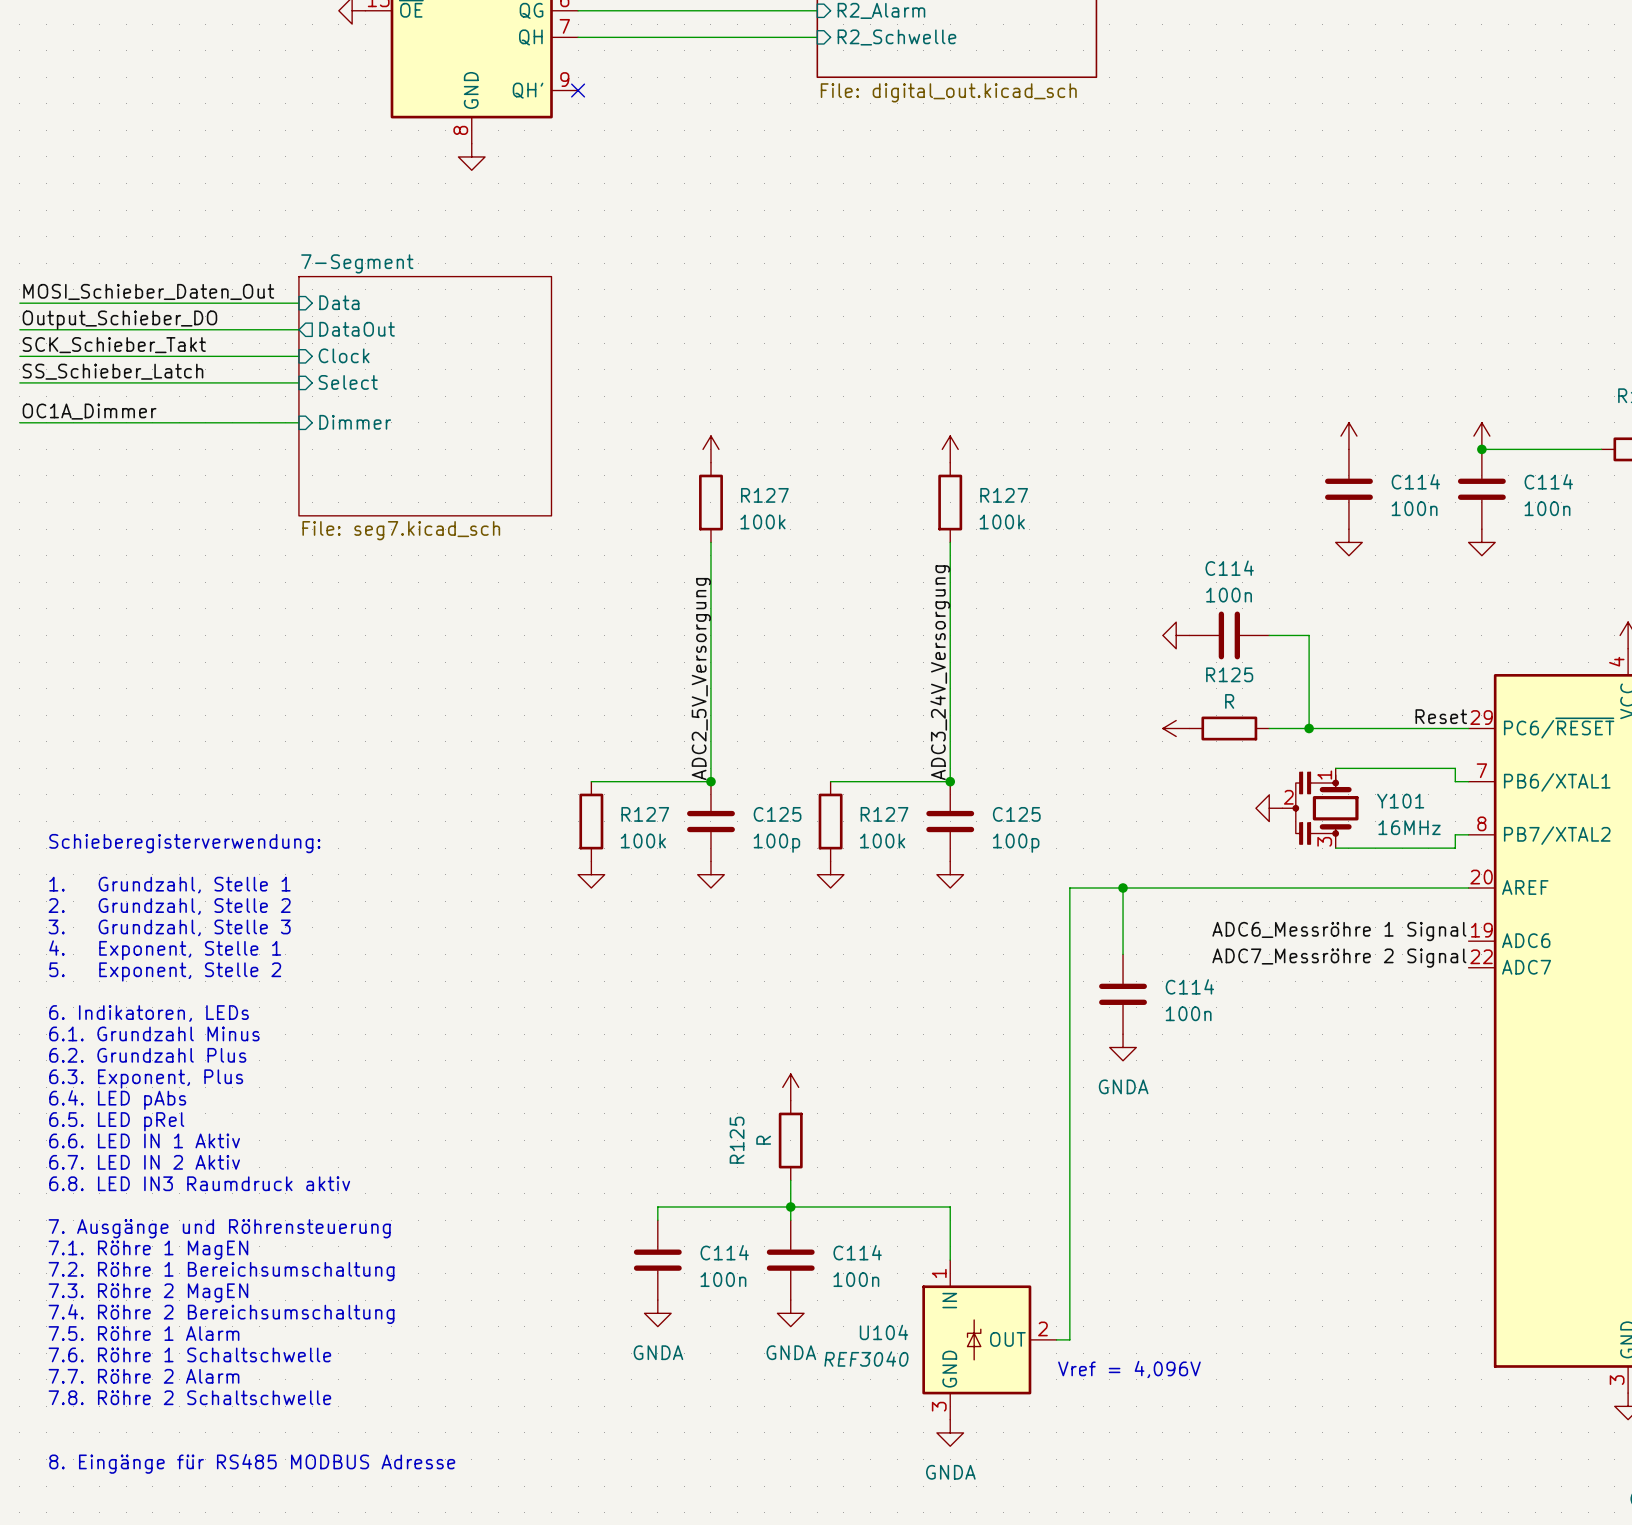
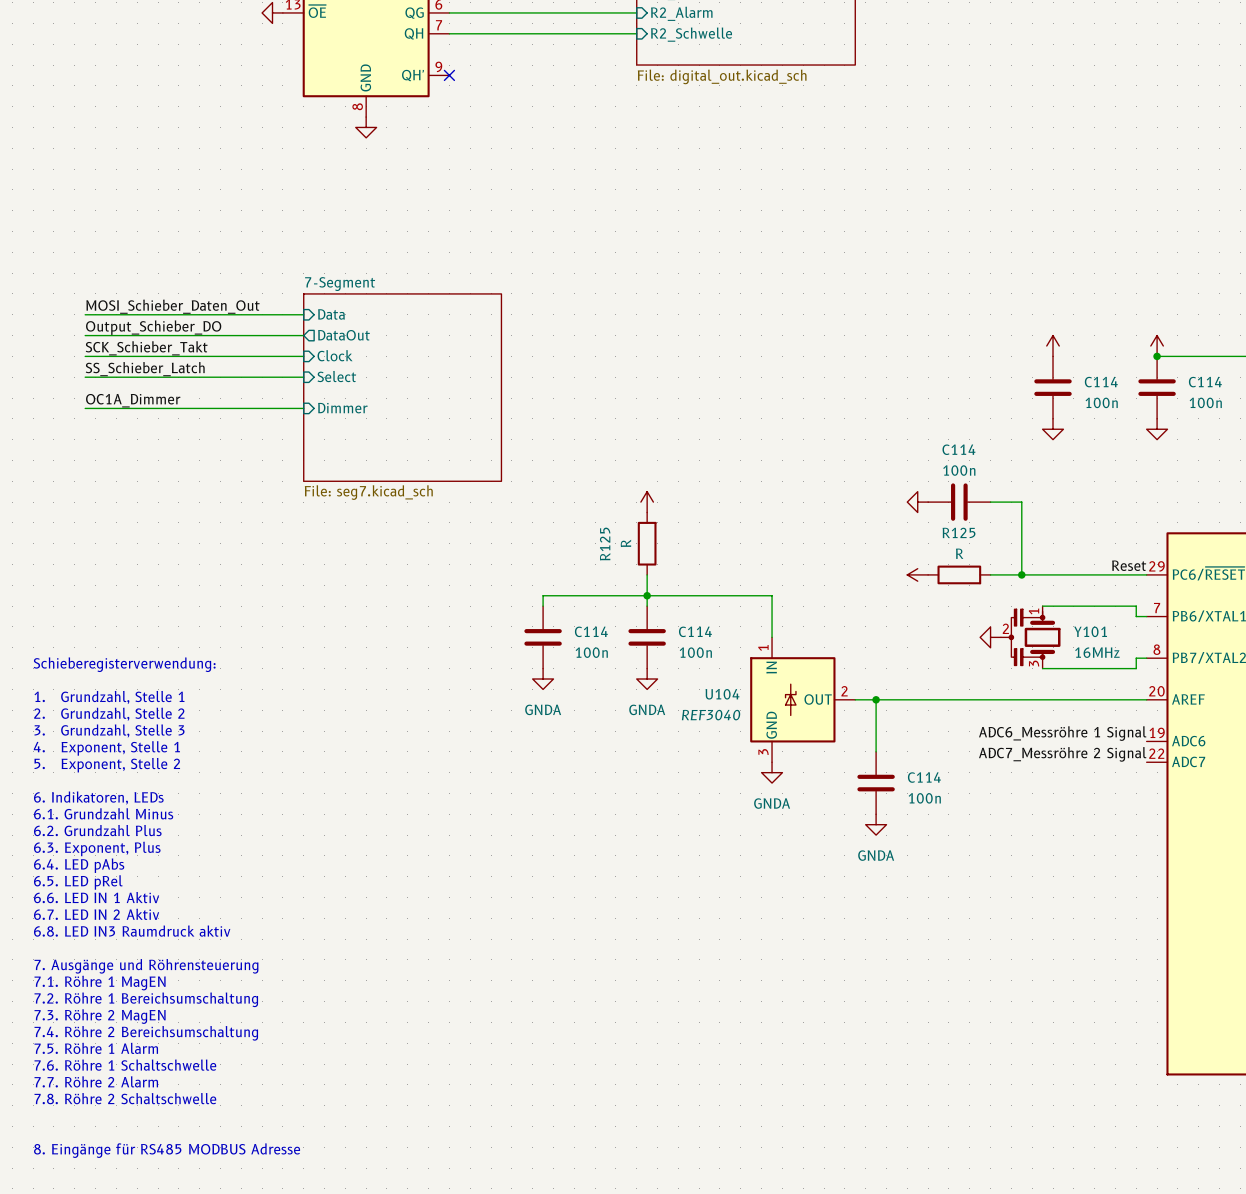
label position: MOSI_Schieber_Daten_Out (148, 291) -> MOSI_Schieber_Daten_Out (172, 306)
sheet pin position: Data (339, 302) -> Data (331, 314)
wire: (19, 303) (298, 303) -> (85, 314) (303, 314)
label position: Output_Schieber_DO (119, 320) -> Output_Schieber_DO (153, 327)
wire: (19, 329) (298, 329) -> (85, 408) (303, 408)
sheet pin position: DataOut (357, 329) -> DataOut (343, 335)
label position: SCK_Schieber_Takt (114, 345) -> SCK_Schieber_Takt (146, 348)
sheet pin position: Clock (344, 355) -> Clock (335, 355)
wire: (19, 356) (298, 356) -> (85, 356) (303, 356)
label position: SS_Schieber_Latch (112, 371) -> SS_Schieber_Latch (145, 369)
wire: (19, 382) (298, 382) -> (85, 377) (303, 377)
sheet pin position: Select (348, 382) -> Select (336, 376)
sheet 7-Segment position: (425, 396) -> (402, 387)
label position: OC1A_Dimmer (89, 411) -> OC1A_Dimmer (133, 400)
wire: (19, 422) (112, 422) -> none
wire: none -> (230, 335) (303, 335)
sheet pin position: Dimmer (355, 422) -> Dimmer (342, 408)
power symbol: (710, 449) -> none
power symbol: (950, 449) -> none
R127: 100k (710, 502) -> none
R127: 100k (950, 502) -> none
wire: (710, 542) (710, 781) (591, 781) -> none
wire: (950, 542) (950, 781) (830, 781) -> none
power symbol: none -> (647, 502)
label: ADC3_24V_Versorgung (940, 672) -> none
label: ADC2_5V_Versorgung (701, 679) -> none
R125: none -> R (647, 543)
wire: none -> (647, 574) (647, 606)
junction: none -> (647, 595)
wire: none -> (543, 606) (543, 595) (772, 595) (772, 637)
junction: (710, 781) -> none
junction: (950, 781) -> none
C114: none -> 100n (543, 637)
C114: none -> 100n (647, 637)
R127: 100k (591, 821) -> none
C125: 100p (710, 821) -> none
R127: 100k (830, 821) -> none
C125: 100p (950, 821) -> none
power symbol: none -> GNDA (543, 679)
power symbol: none -> GNDA (647, 679)
power symbol: (591, 874) -> none
power symbol: (710, 874) -> none
power symbol: (830, 874) -> none
power symbol: (950, 874) -> none
wire: (1096, 888) (1069, 888) (1069, 1339) (1056, 1339) -> none
power symbol: none -> GNDA (772, 772)
power symbol: (790, 1087) -> none
R125: R (790, 1140) -> none
wire: (790, 1180) (790, 1220) -> none
junction: (790, 1206) -> none
wire: (657, 1220) (657, 1206) (950, 1206) (950, 1260) -> none
C114: 100n (657, 1260) -> none
C114: 100n (790, 1260) -> none
power symbol: GNDA (657, 1313) -> none
power symbol: GNDA (790, 1313) -> none
U104 position: (989, 1339) -> (802, 699)
text: Vref = 4,096V (1129, 1369) -> none
power symbol: GNDA (950, 1432) -> none

